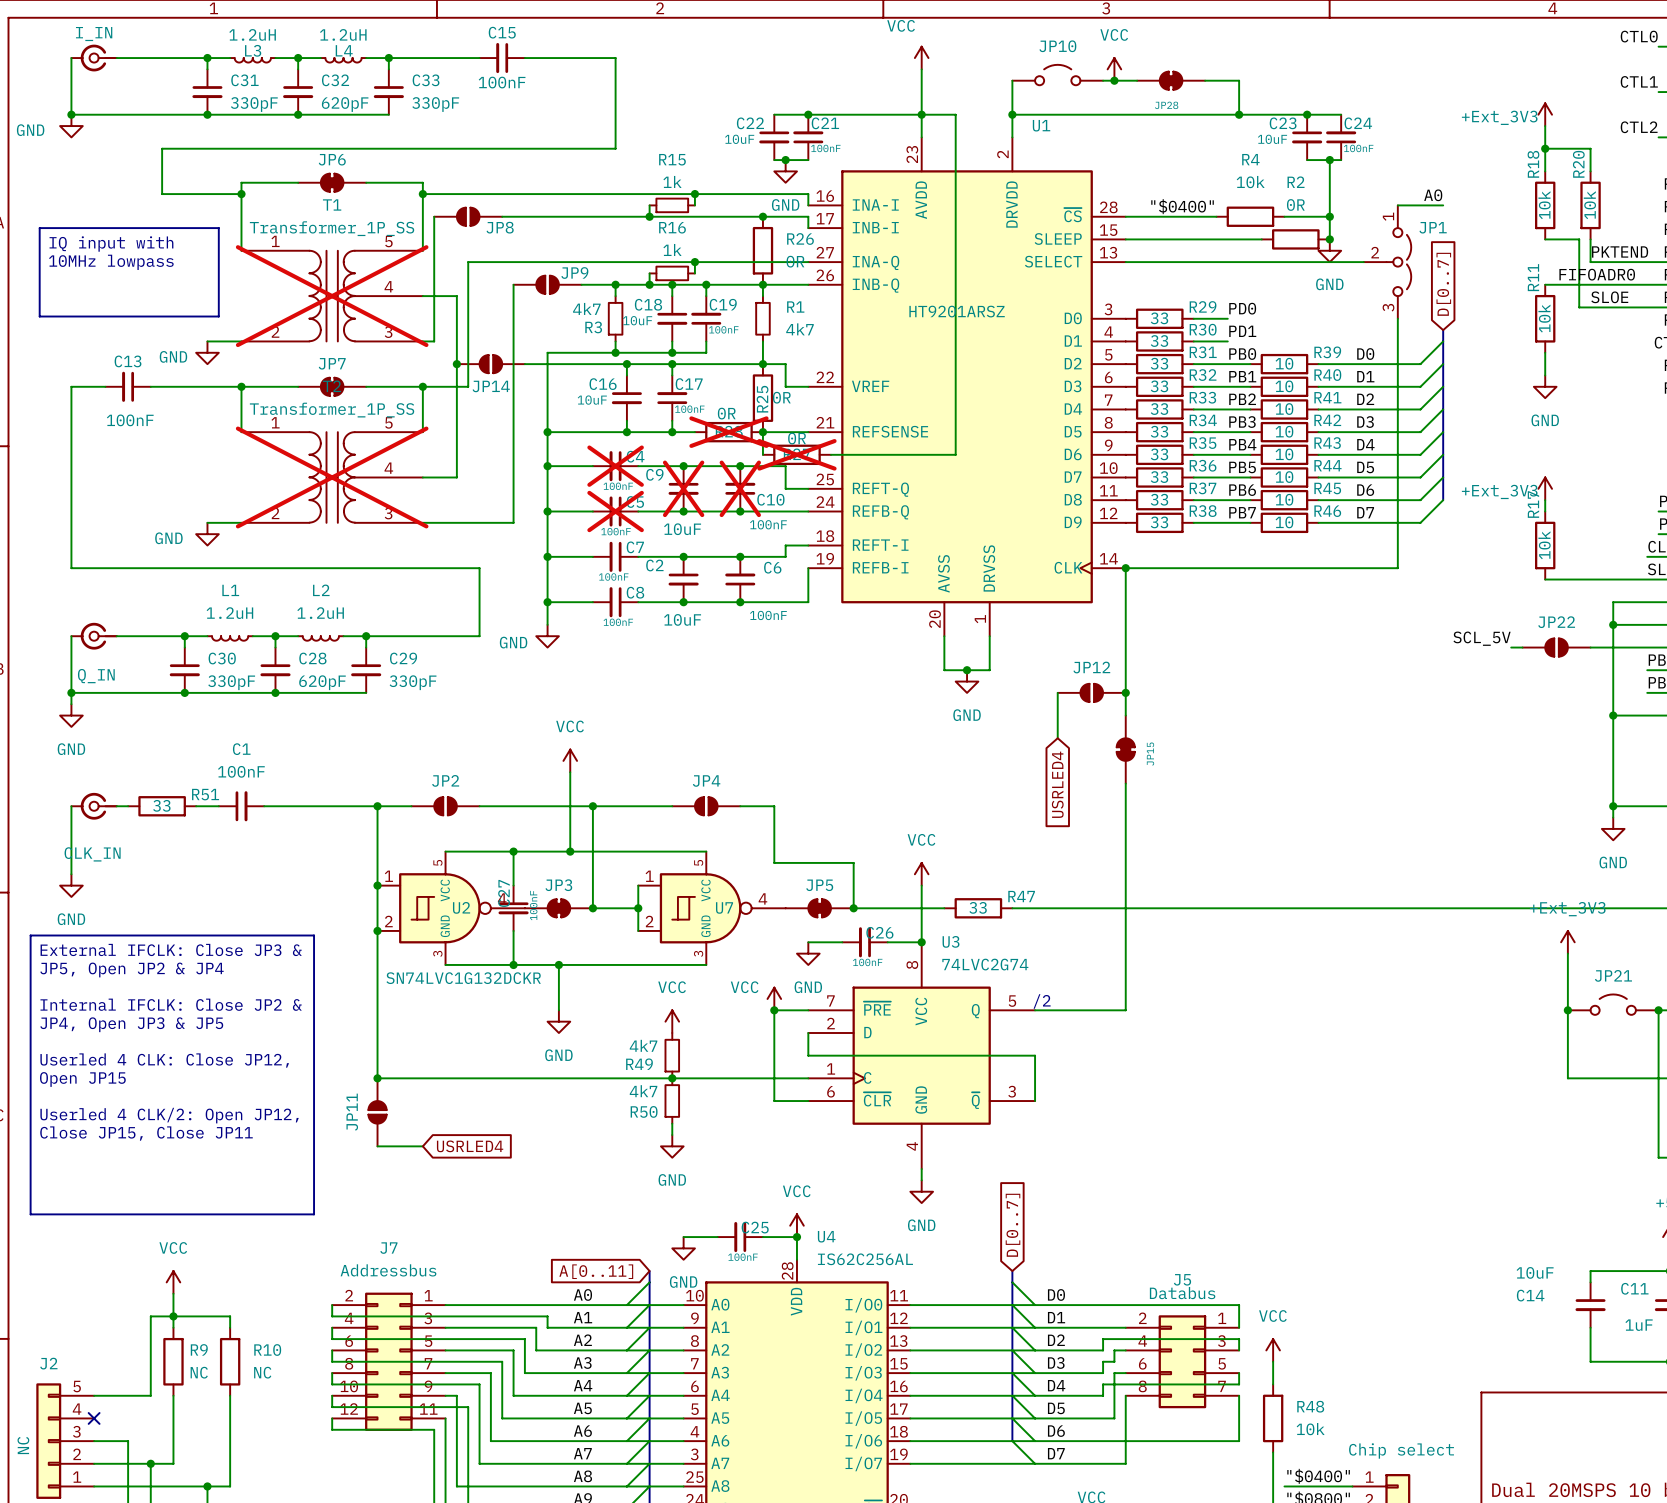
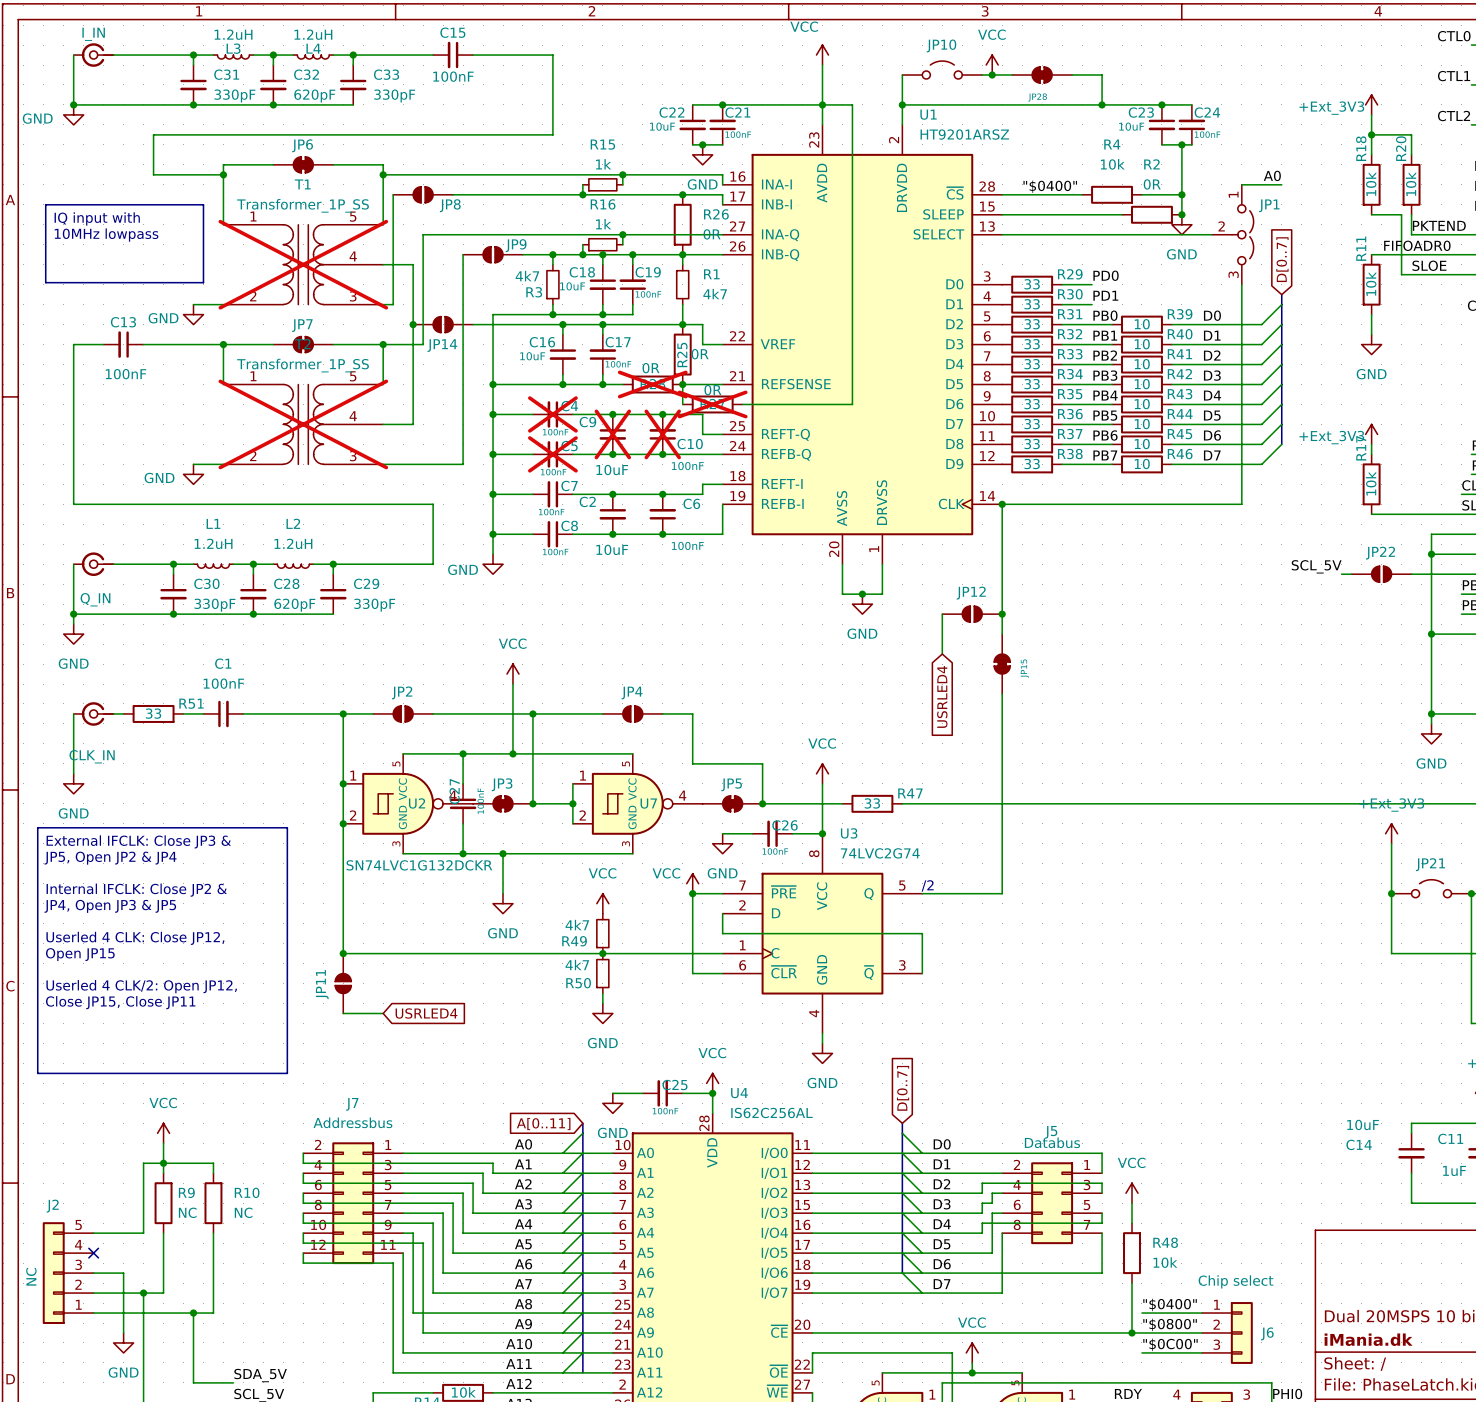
U1 value position: HT9201ARSZ (957, 311) -> HT9201ARSZ (964, 134)

